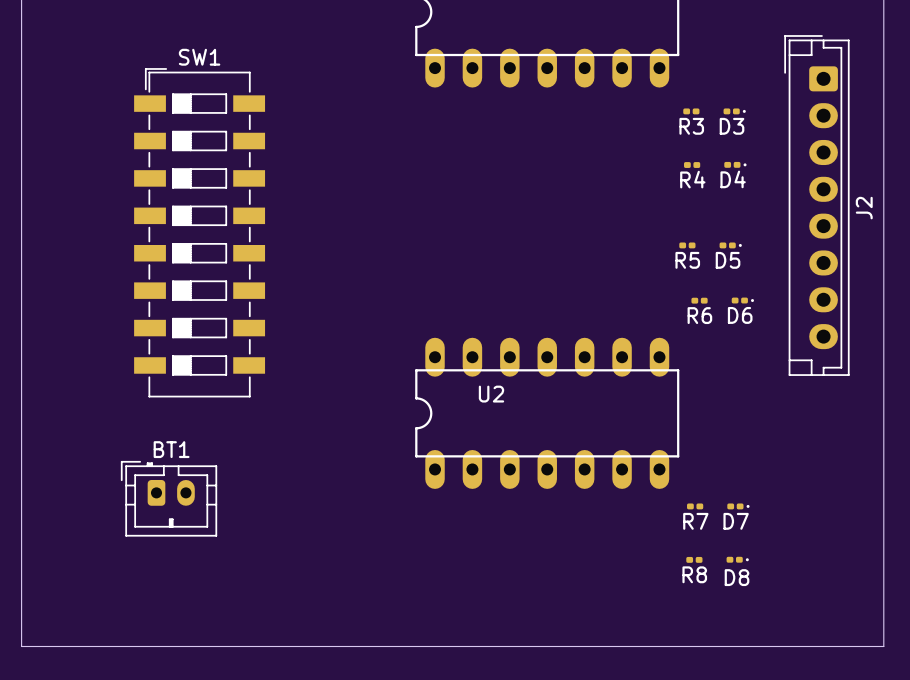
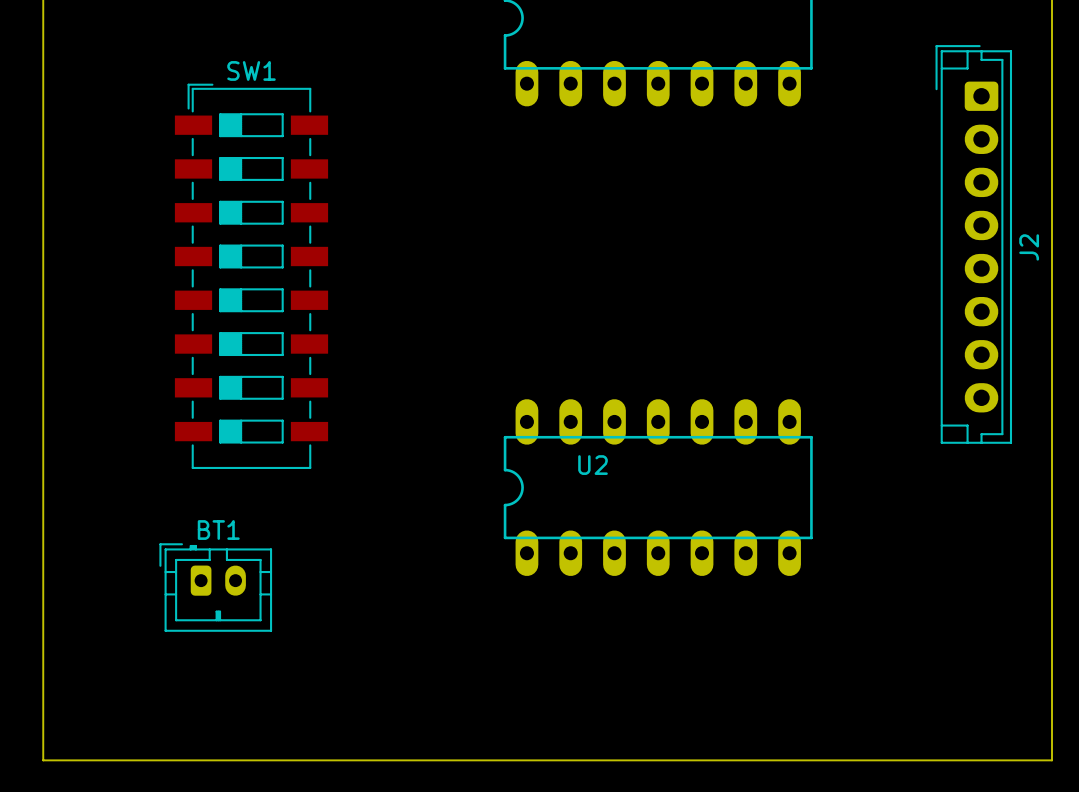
R3: (691, 111) -> none
D3: (734, 111) -> none
D4: (735, 164) -> none
R4: (692, 165) -> none
R5: (687, 245) -> none
D5: (730, 245) -> none
R6: (699, 300) -> none
D6: (742, 300) -> none
R7: (695, 506) -> none
D7: (738, 506) -> none
R8: (694, 559) -> none
D8: (737, 559) -> none

